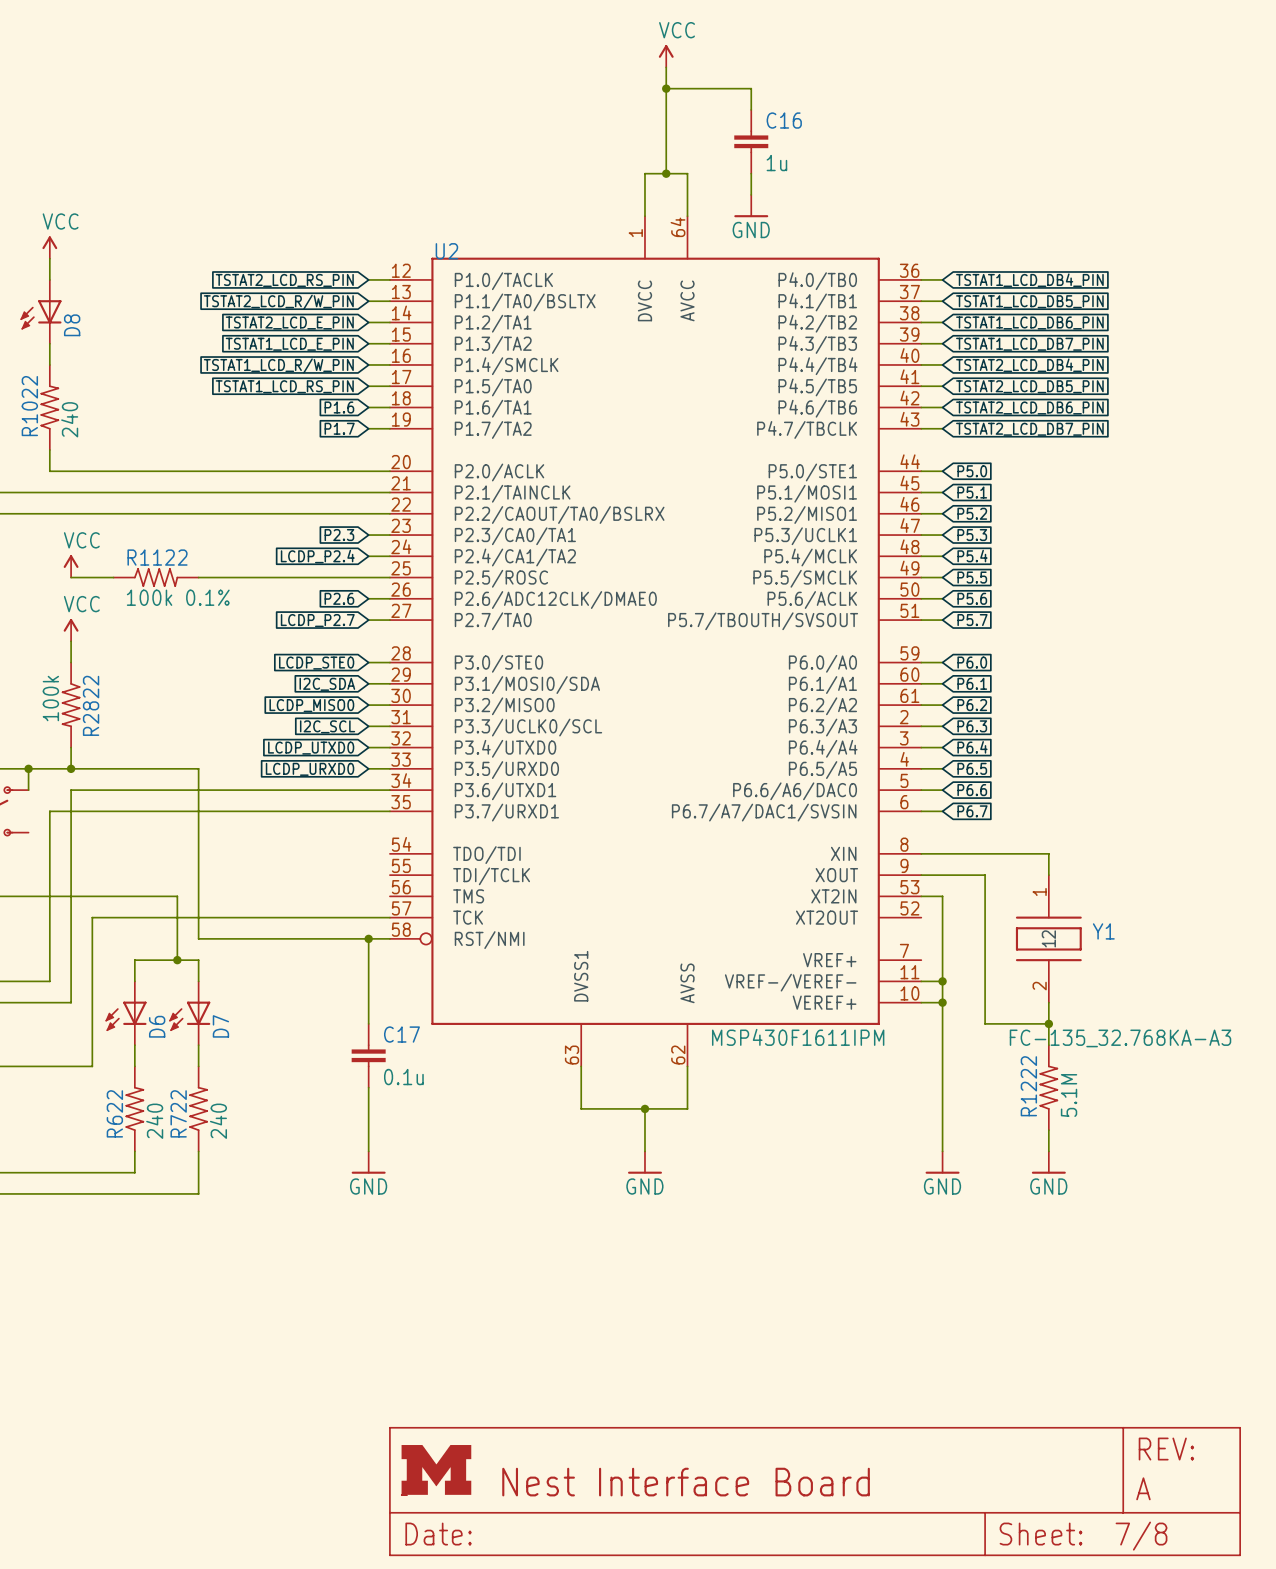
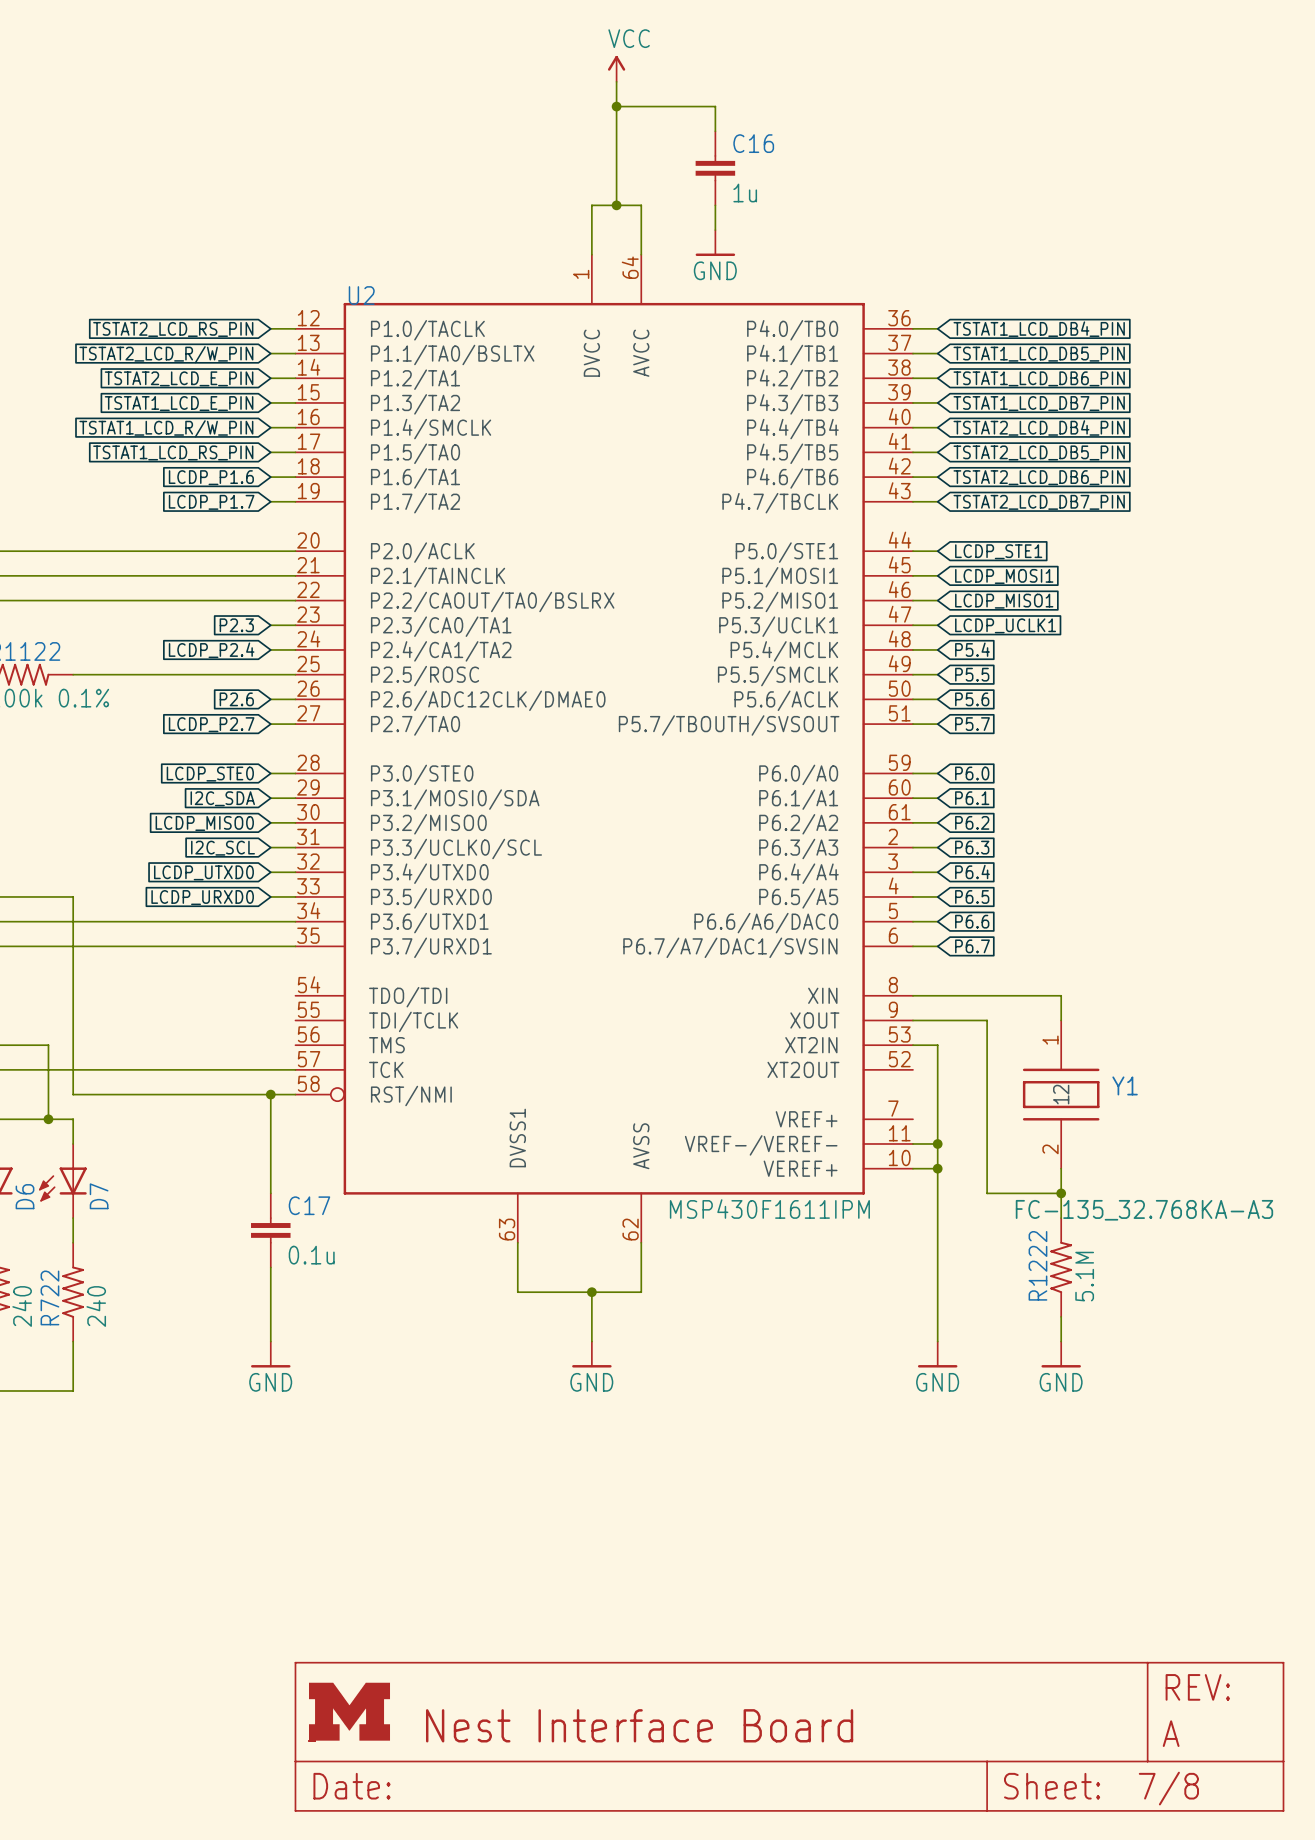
global label: P1.6 (339, 407) -> LCDP_P1.6 (211, 477)
global label: P1.7 (339, 428) -> LCDP_P1.7 (211, 502)
global label: P5.0 (972, 471) -> LCDP_STE1 (998, 551)
global label: P5.1 (972, 492) -> LCDP_MOSI1 (1004, 576)
global label: P5.2 (972, 513) -> LCDP_MISO1 (1004, 601)
global label: P5.3 (972, 535) -> LCDP_UCLK1 (1005, 625)

